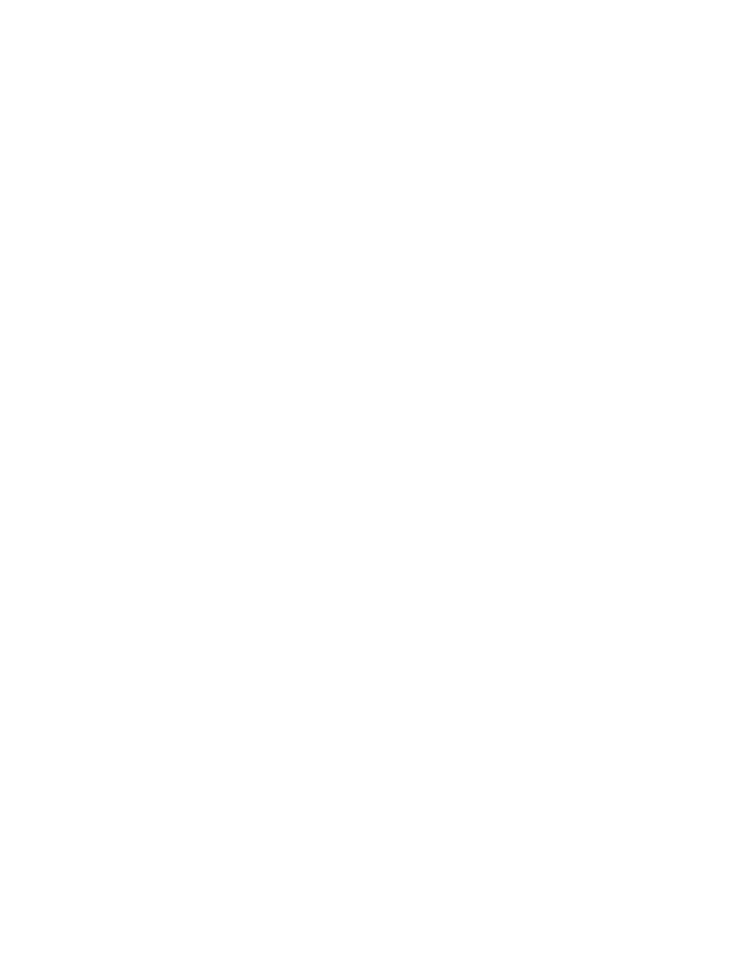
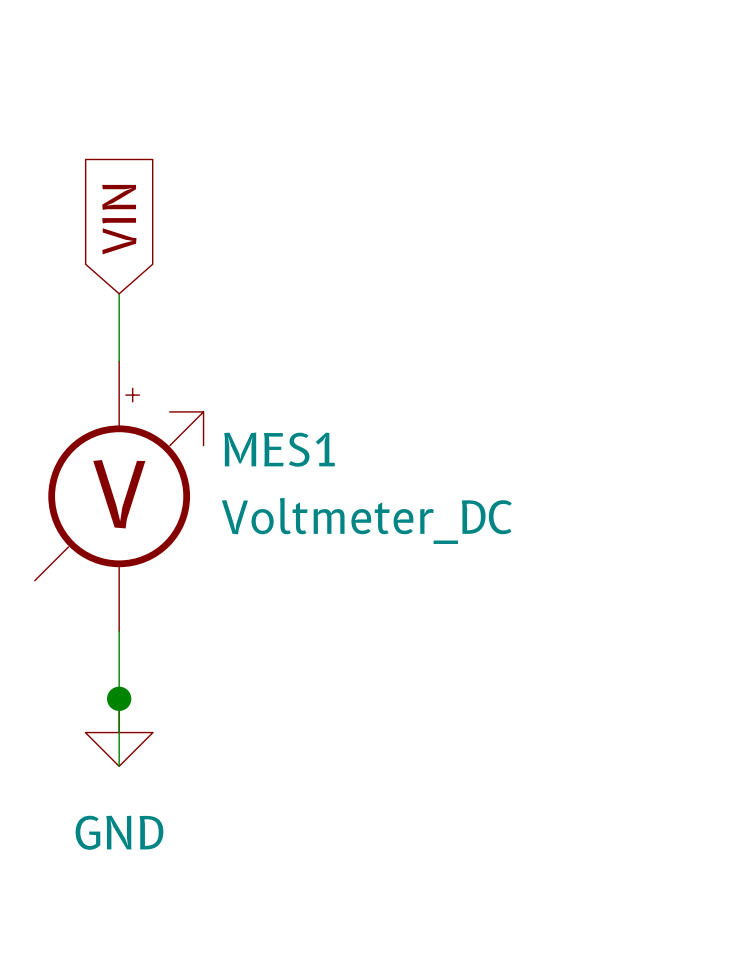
global label: none -> VIN (119, 219)
wire: none -> (119, 293) (119, 361)
MES1: none -> Voltmeter_DC (119, 496)
wire: none -> (119, 631) (119, 766)
junction: none -> (119, 698)
power symbol: none -> GND (119, 732)

